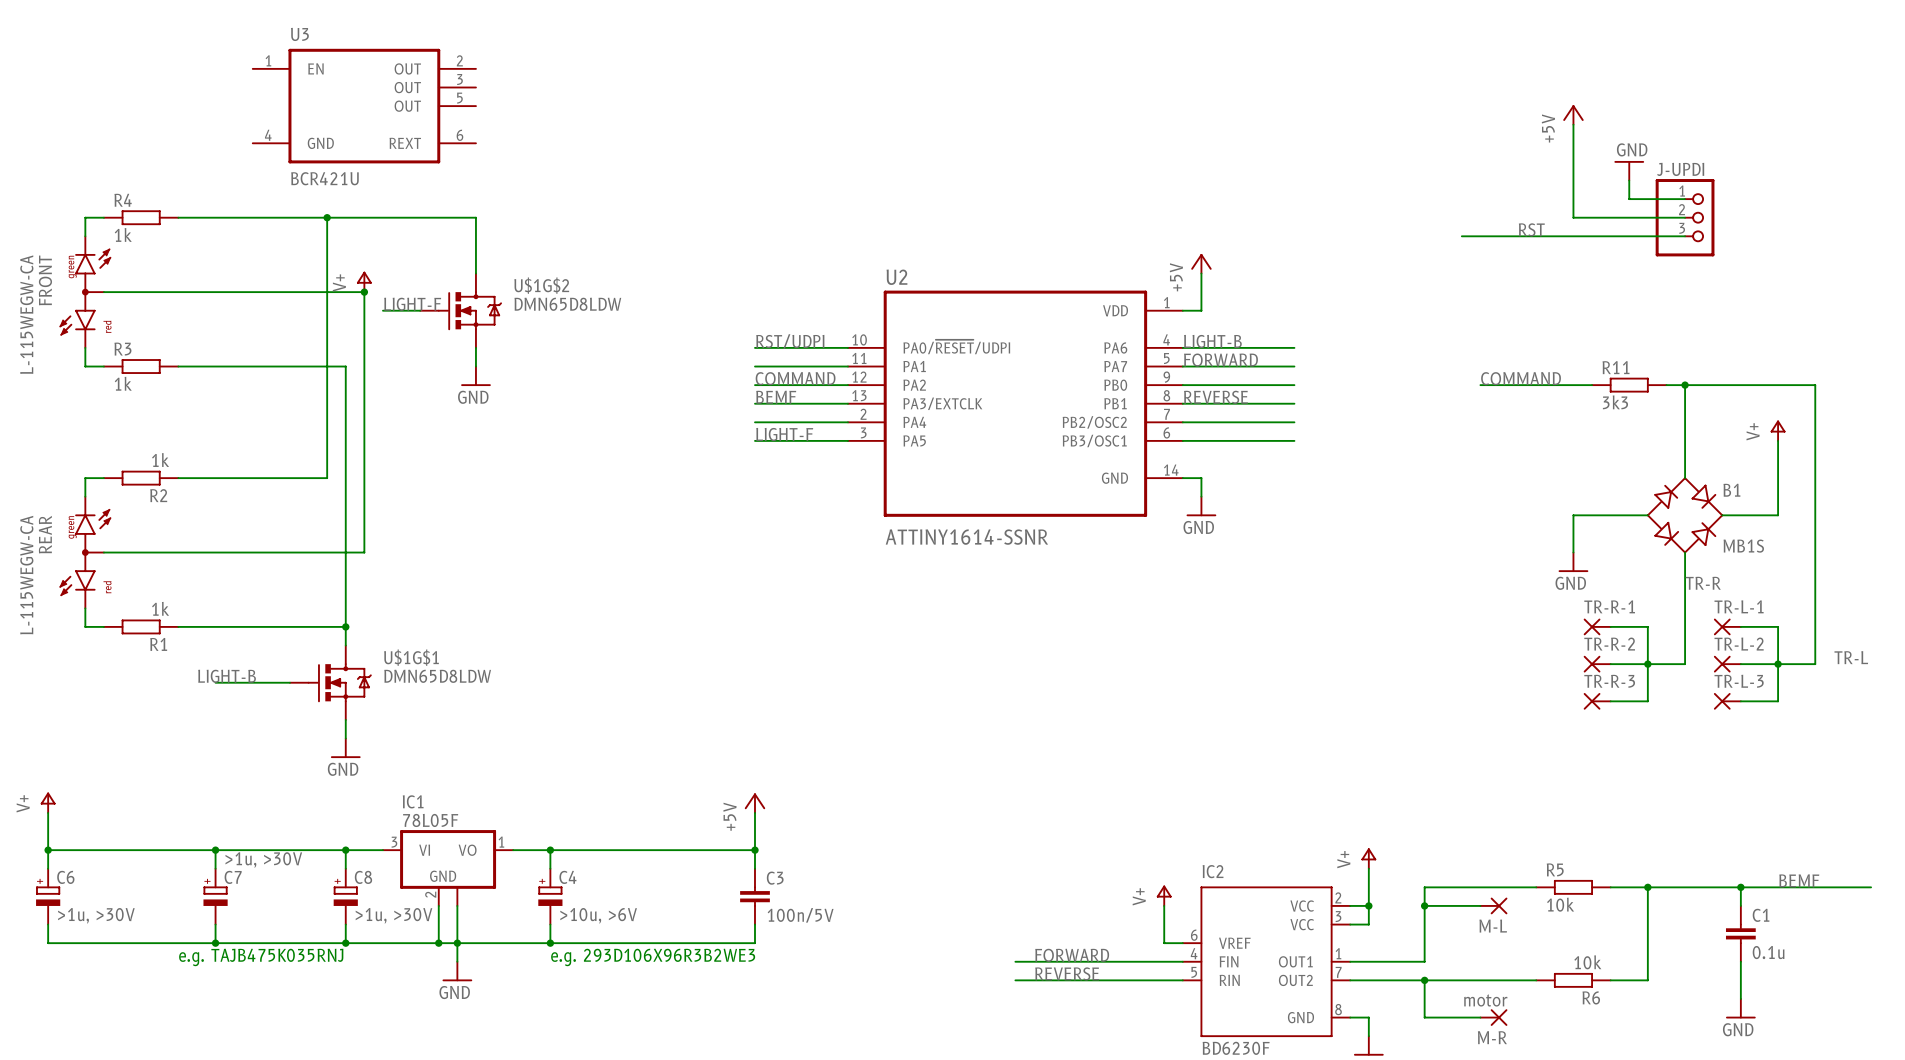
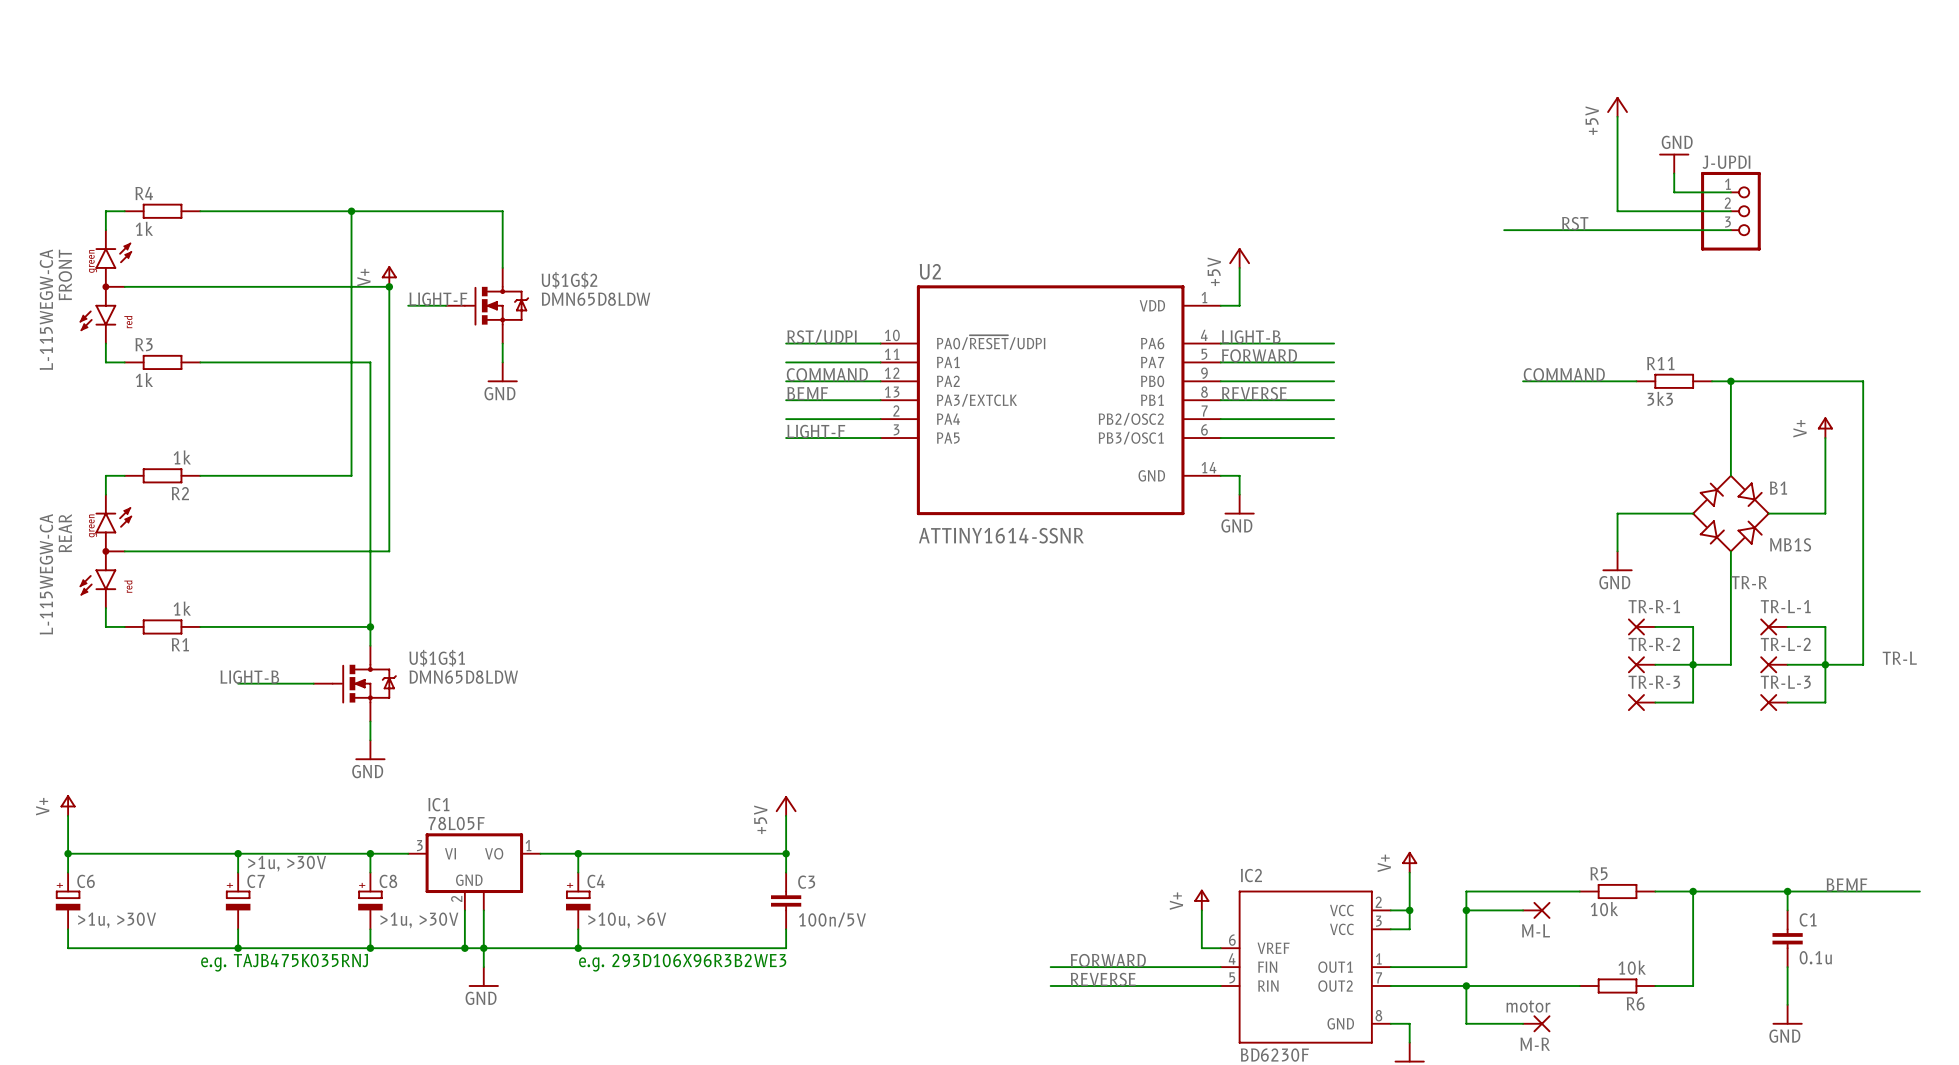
U3: BCR421U (364, 106) -> none

